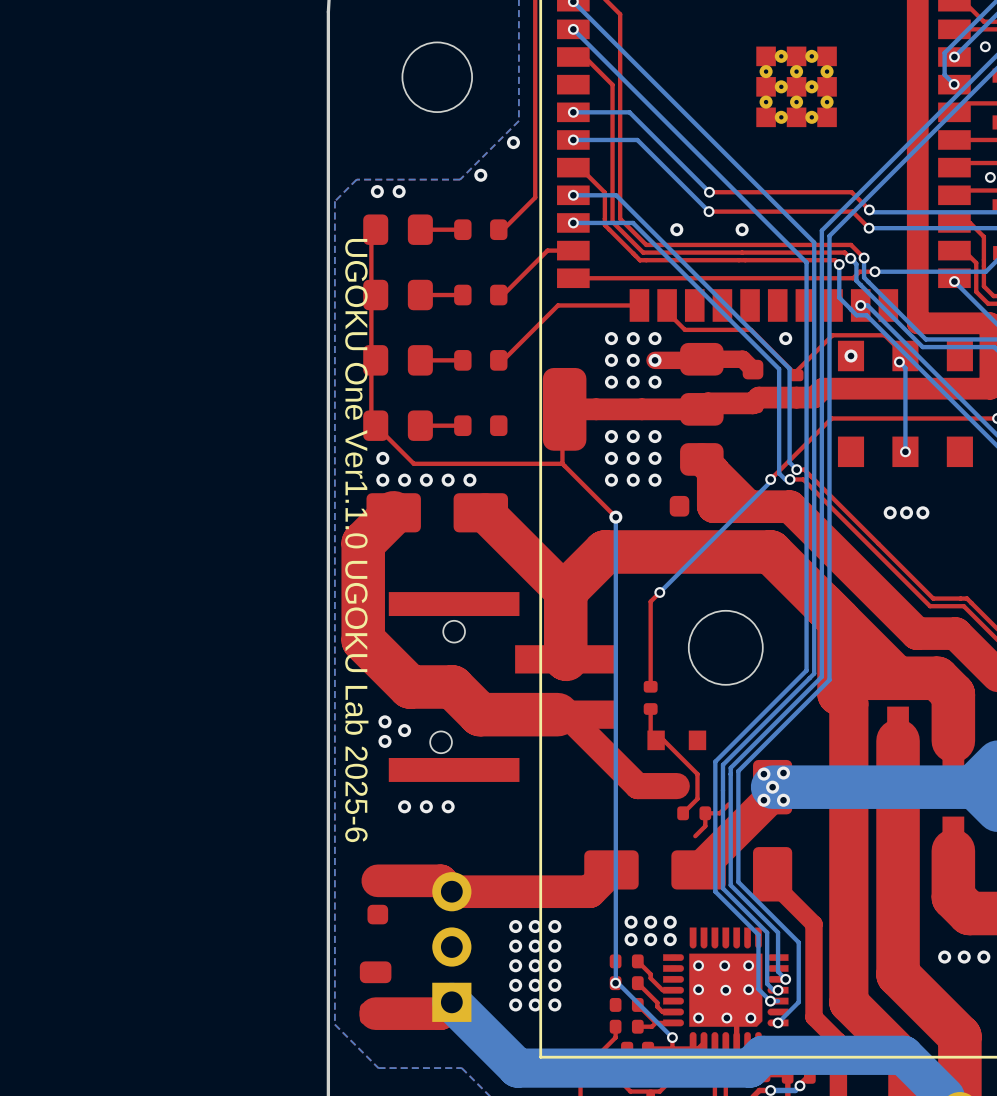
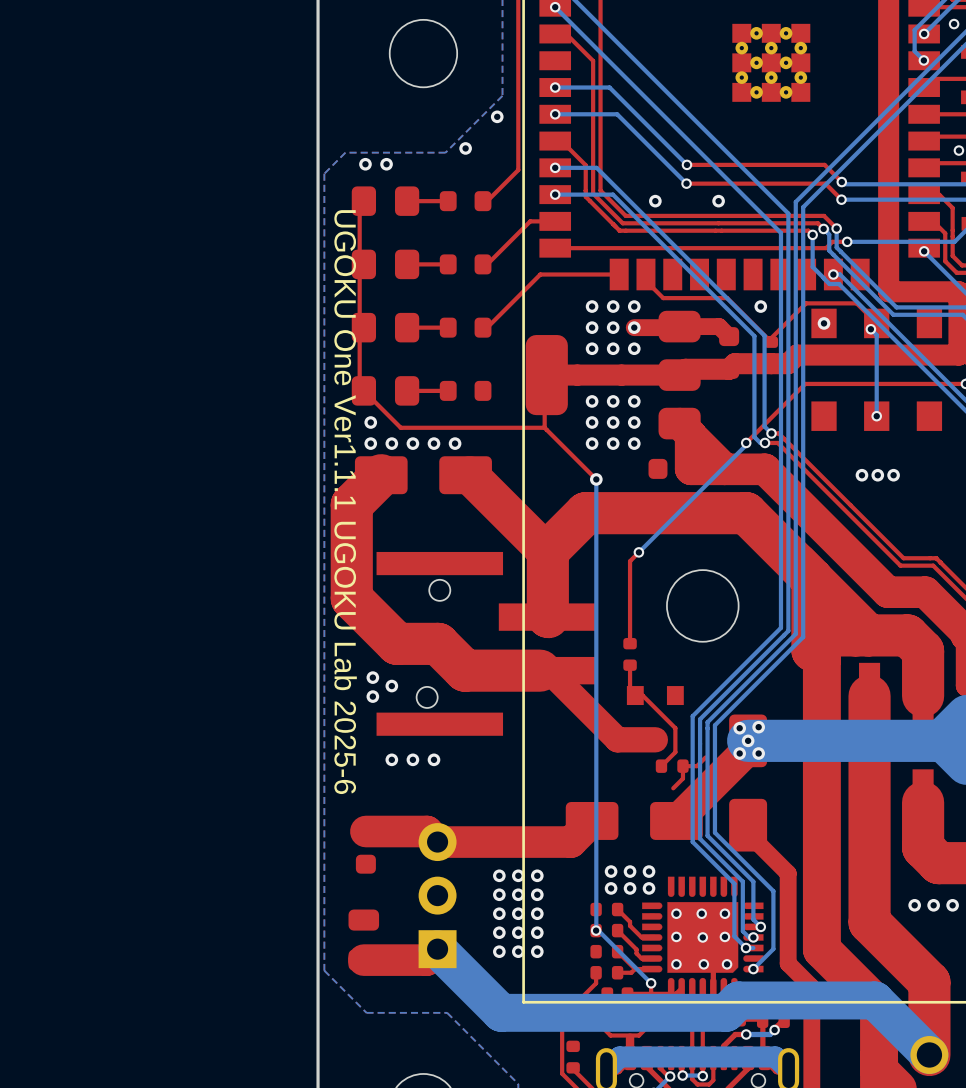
text: UGOKU One Ver1.1.0 UGOKU Lab 2025-6 (356, 540) -> UGOKU One Ver1.1.1 UGOKU Lab 2025-6 (345, 502)

